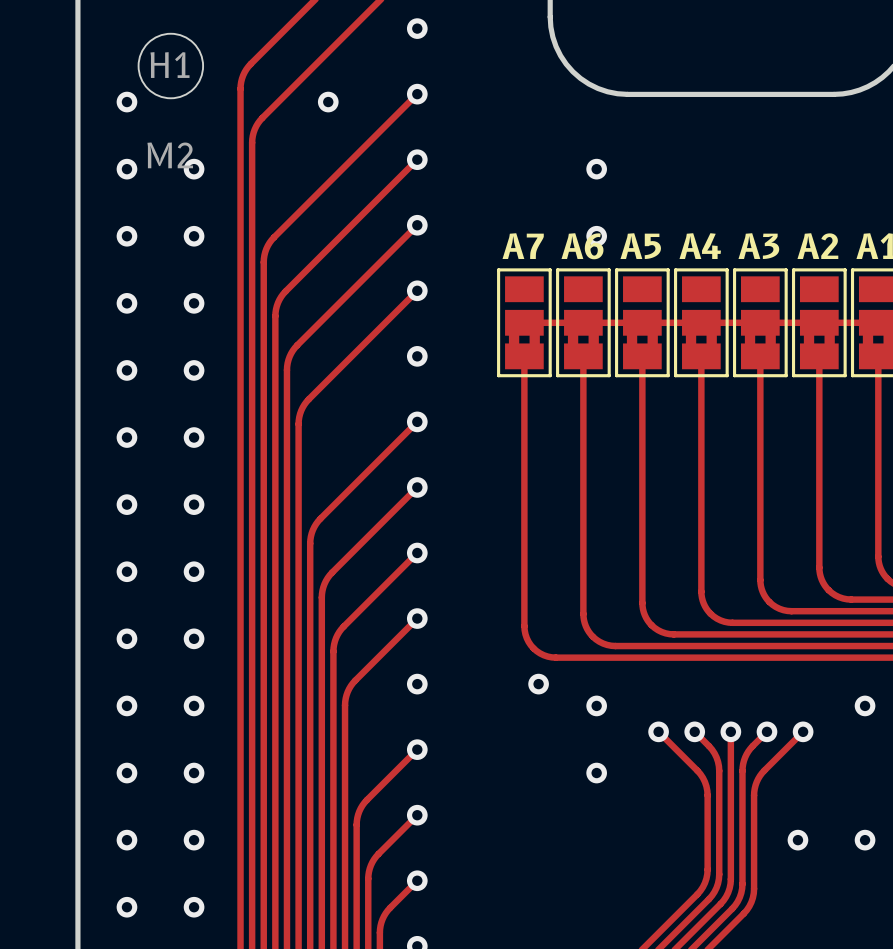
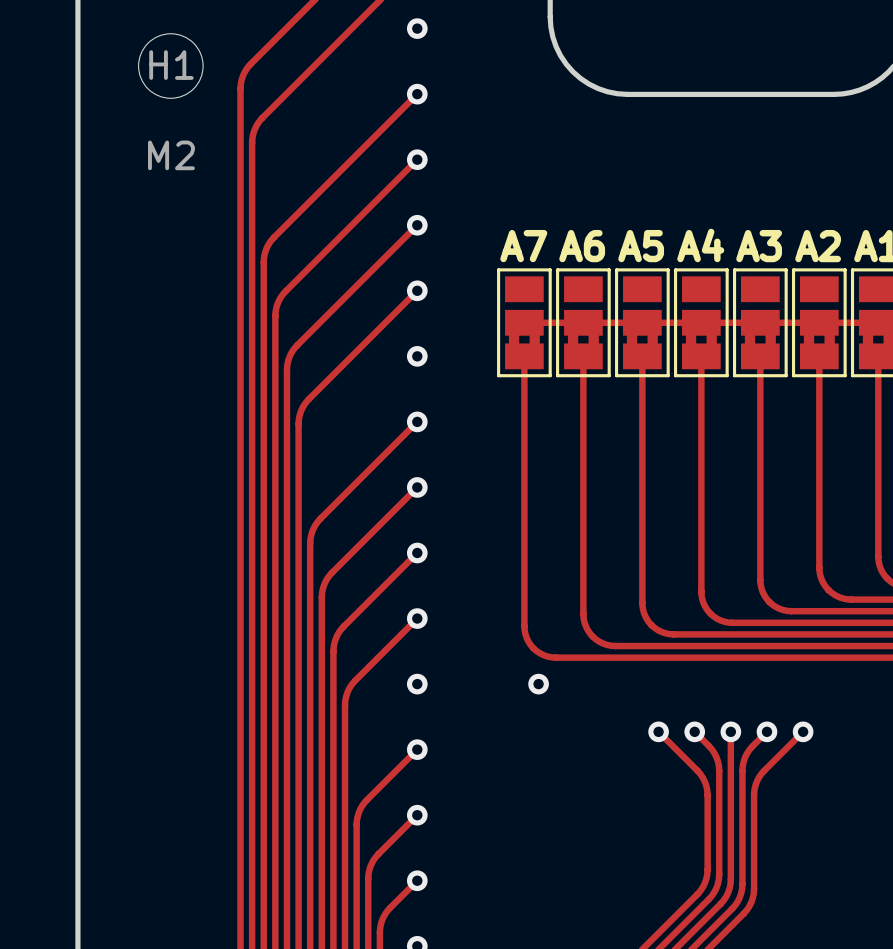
via: (126, 102) -> none
via: (328, 102) -> none
via: (126, 169) -> none
via: (194, 169) -> none
via: (596, 169) -> none
via: (126, 236) -> none
via: (194, 236) -> none
via: (596, 236) -> none
via: (126, 303) -> none
via: (194, 303) -> none
via: (126, 370) -> none
via: (194, 370) -> none
via: (126, 437) -> none
via: (194, 437) -> none
via: (126, 504) -> none
via: (194, 504) -> none
via: (126, 571) -> none
via: (194, 571) -> none
via: (126, 638) -> none
via: (194, 638) -> none
via: (126, 705) -> none
via: (194, 705) -> none
via: (596, 705) -> none
via: (865, 705) -> none
via: (126, 773) -> none
via: (194, 773) -> none
via: (596, 773) -> none
via: (126, 840) -> none
via: (194, 840) -> none
via: (797, 840) -> none
via: (865, 840) -> none
via: (126, 907) -> none
via: (194, 907) -> none

